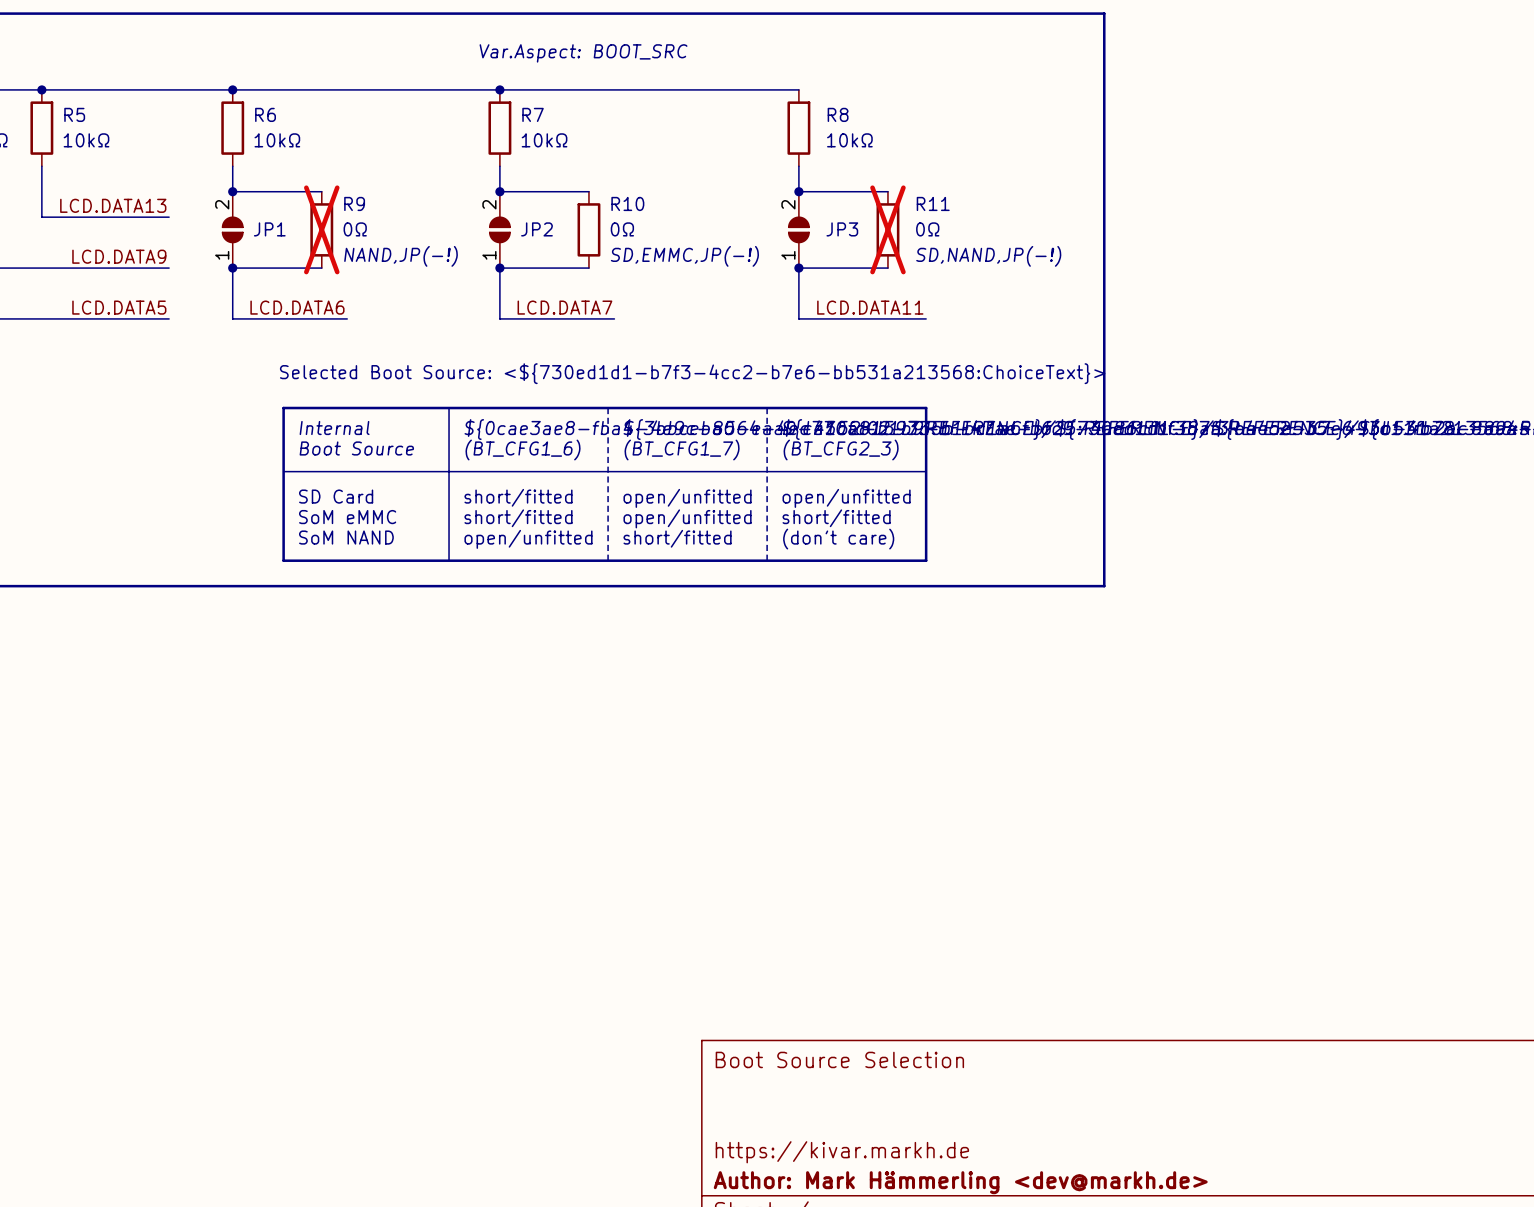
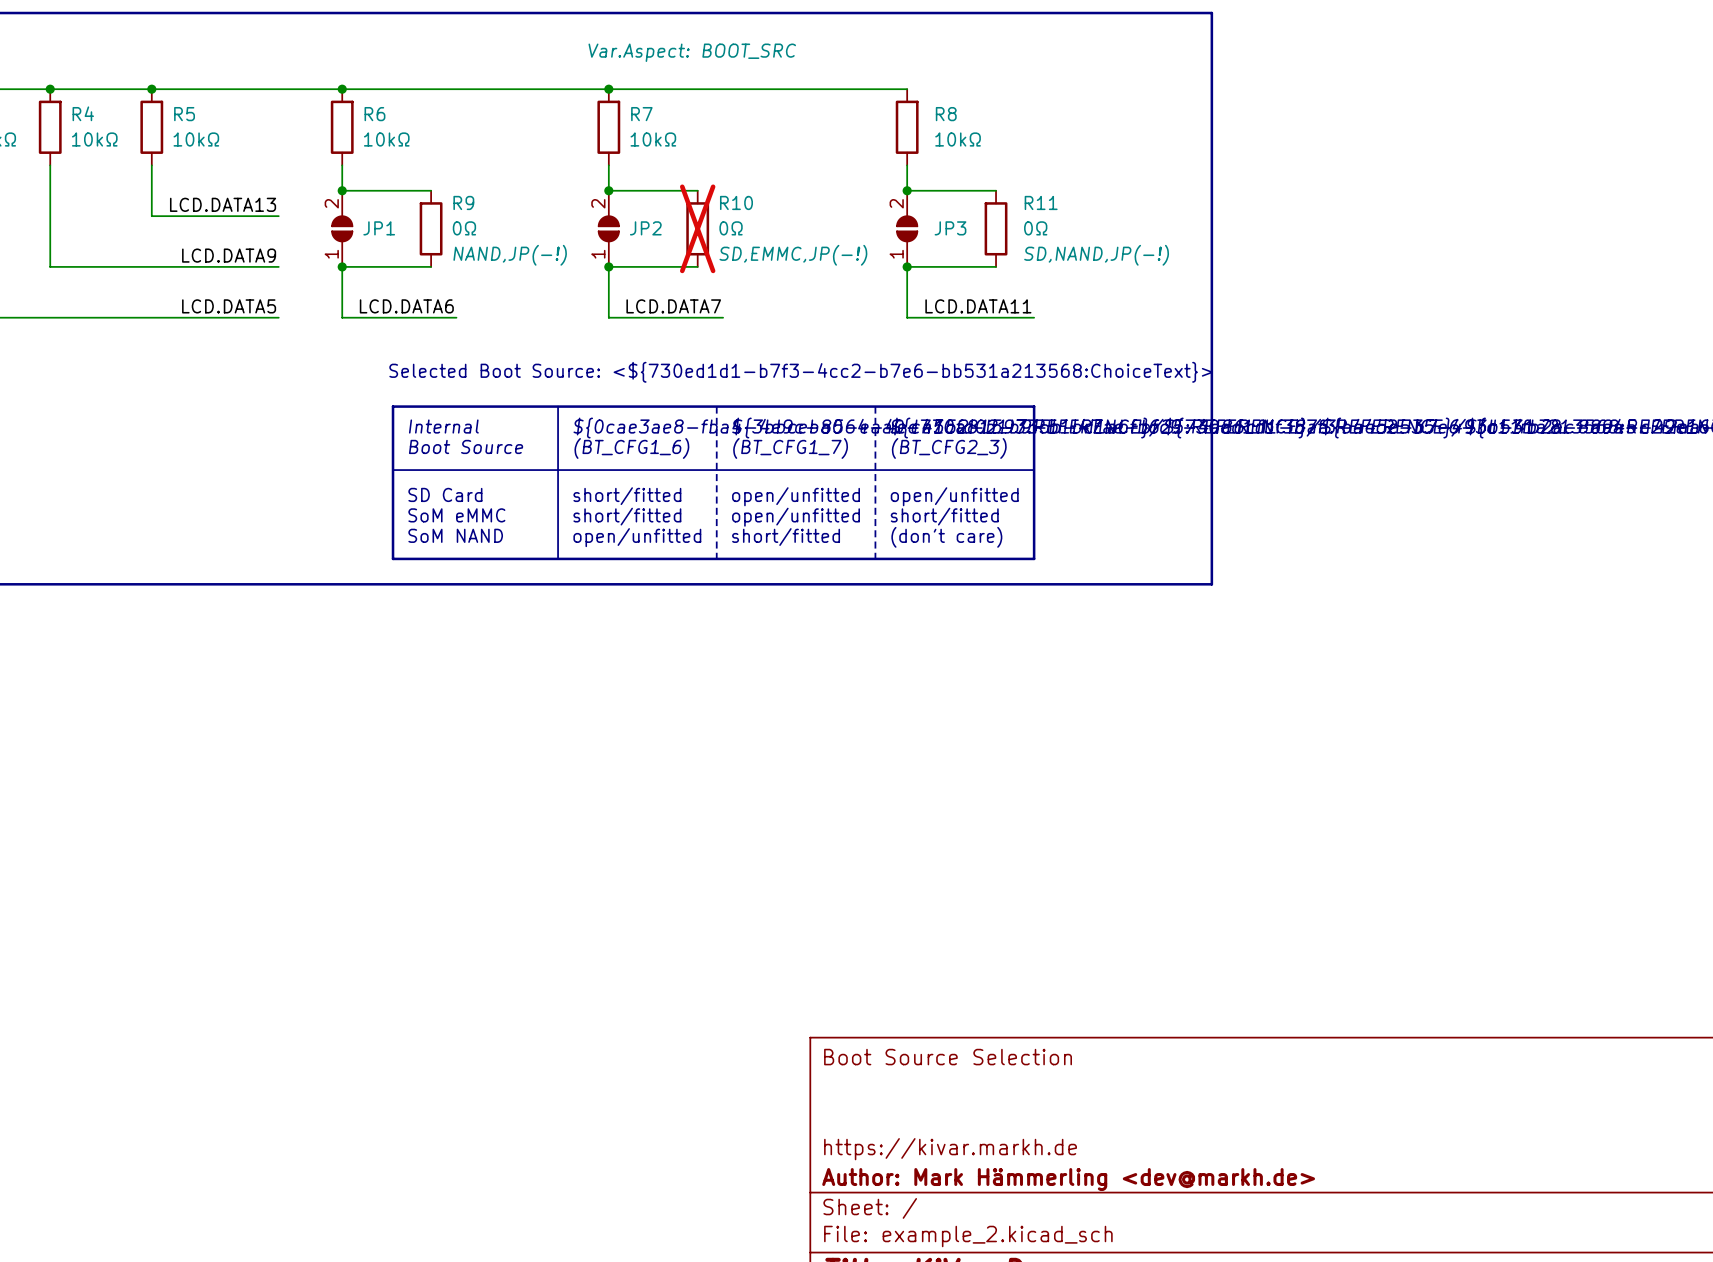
R9 do-not-place cross: (321, 229) -> none
R10 do-not-place cross: none -> (697, 228)
R11 do-not-place cross: (887, 229) -> none

